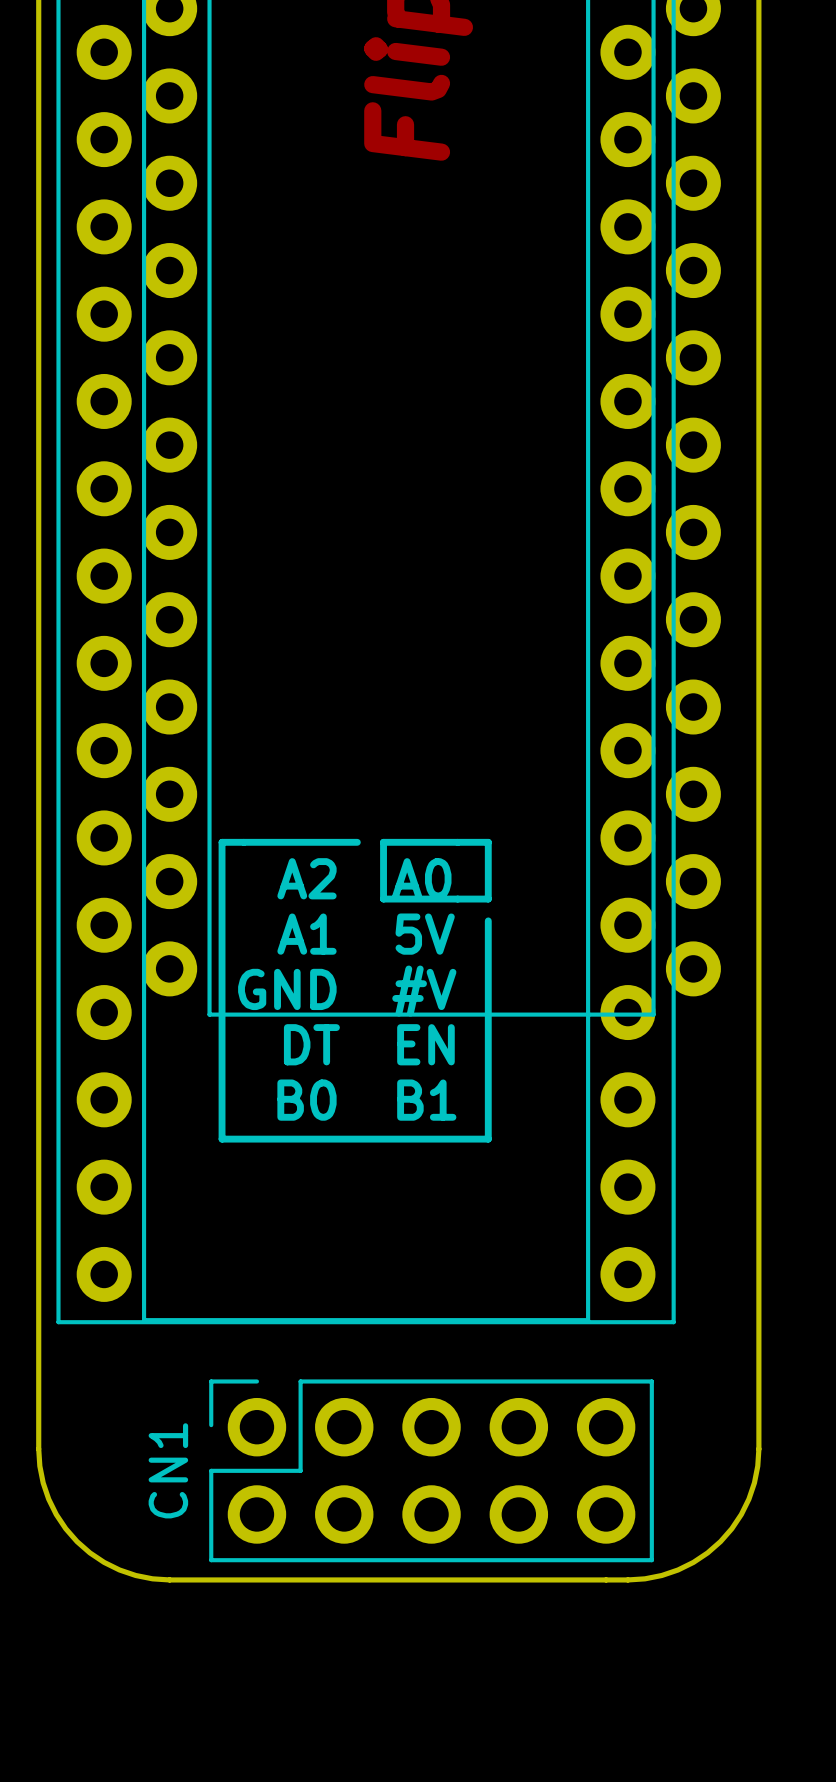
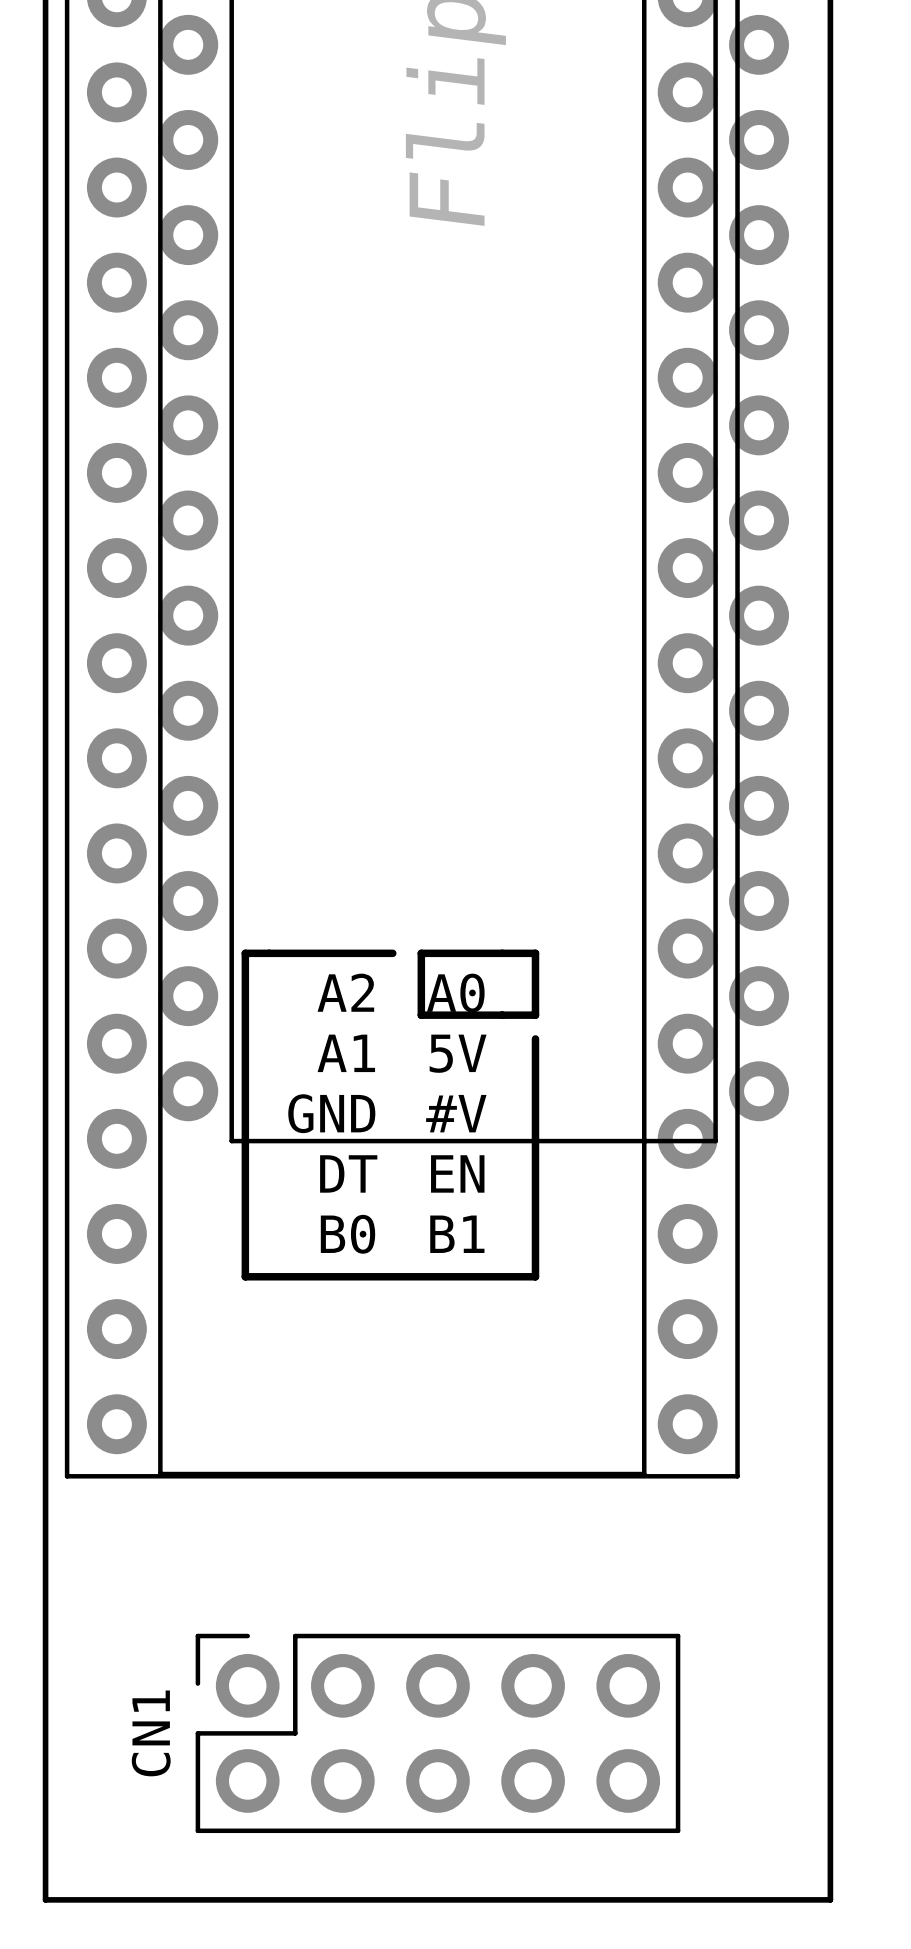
board edge: (38, 1449) (39, 1466) (48, 1499) (56, 1514) (77, 1541) (104, 1562) (119, 1569) (152, 1578) (169, 1579) (627, 1579) (661, 1575) (693, 1562) (720, 1541) (731, 1528) (741, 1514) (754, 1482) (758, 1449) -> (45, 1614) (45, 1899) (830, 1899) (830, 1614)
CN1 position: (431, 1470) -> (437, 1733)

